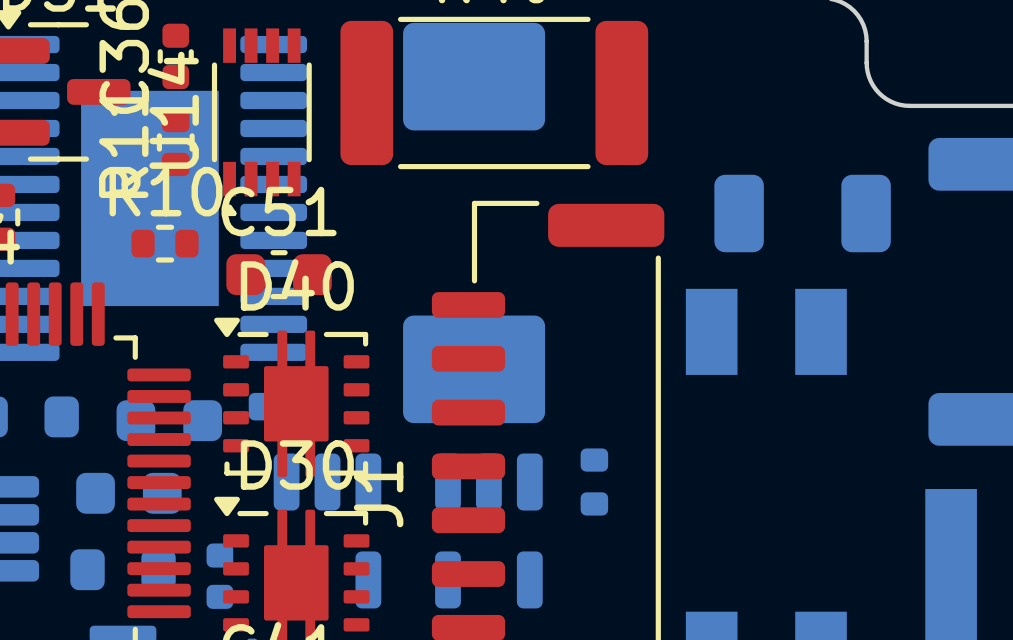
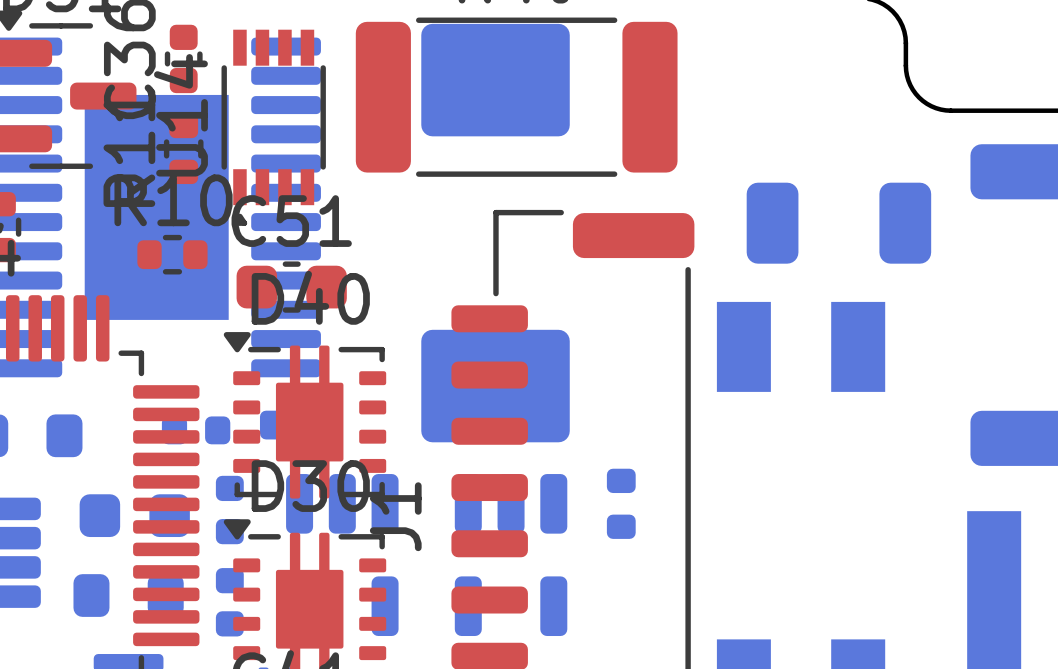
part footprint: [116, 400, 223, 442] -> [161, 416, 231, 445]
part: none -> (229, 510)

